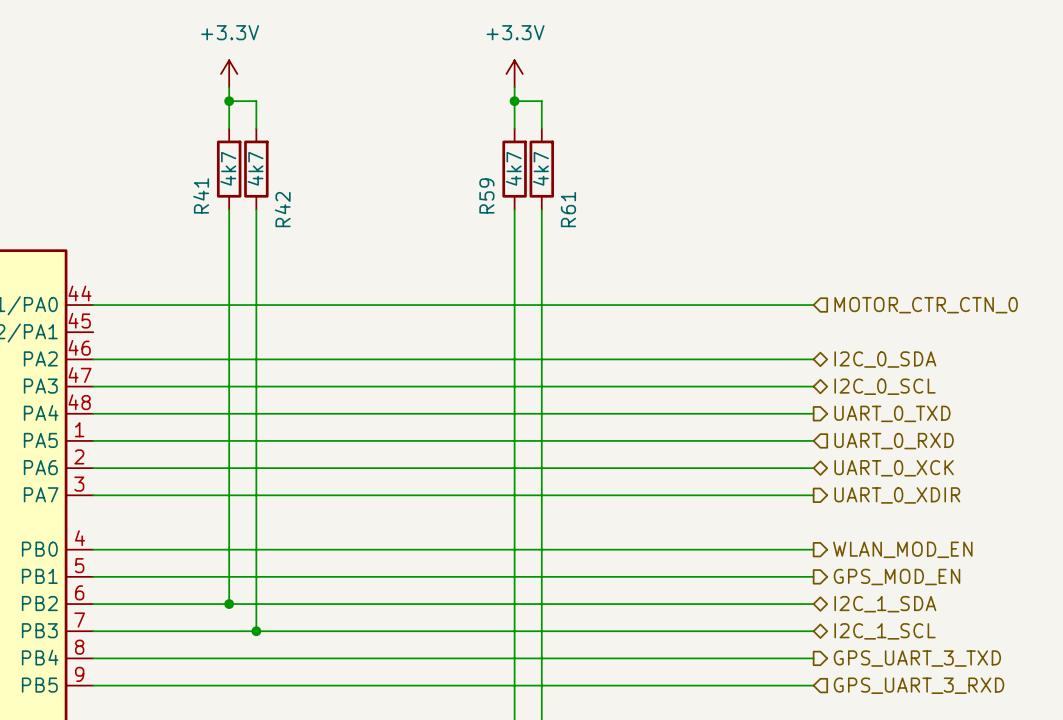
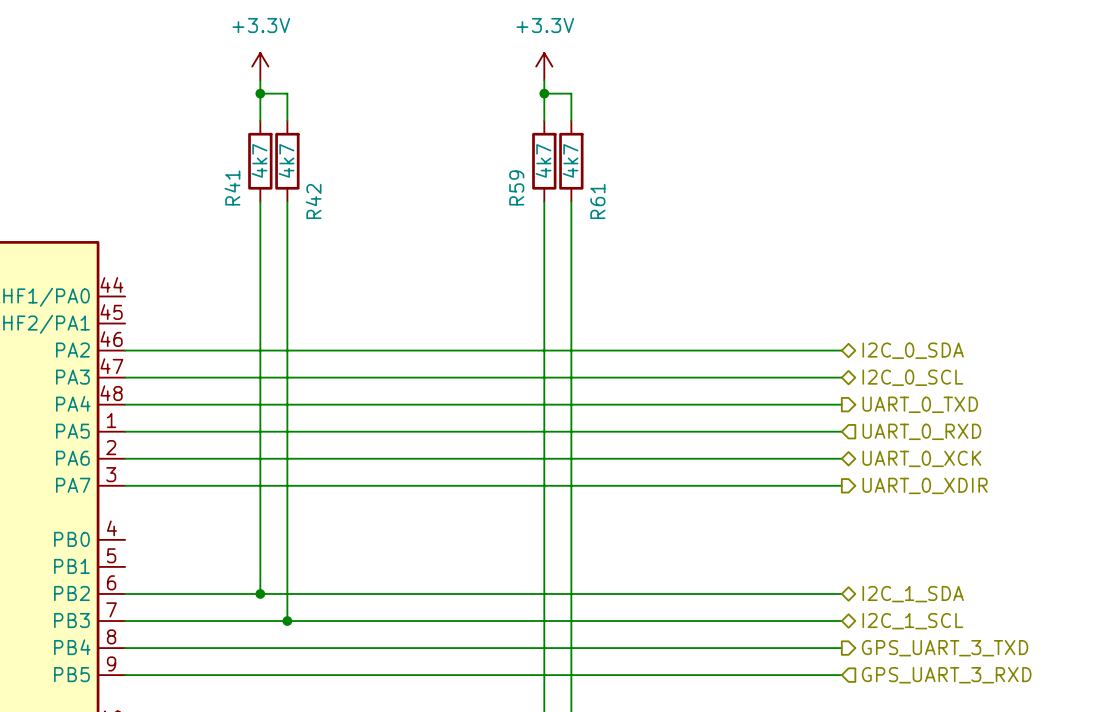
wire: (93, 305) (813, 305) -> none
hierarchical label: MOTOR_CTR_CTN_0 (926, 305) -> none
wire: (93, 549) (813, 549) -> none
hierarchical label: WLAN_MOD_EN (902, 549) -> none
wire: (93, 576) (813, 576) -> none
hierarchical label: GPS_MOD_EN (897, 577) -> none

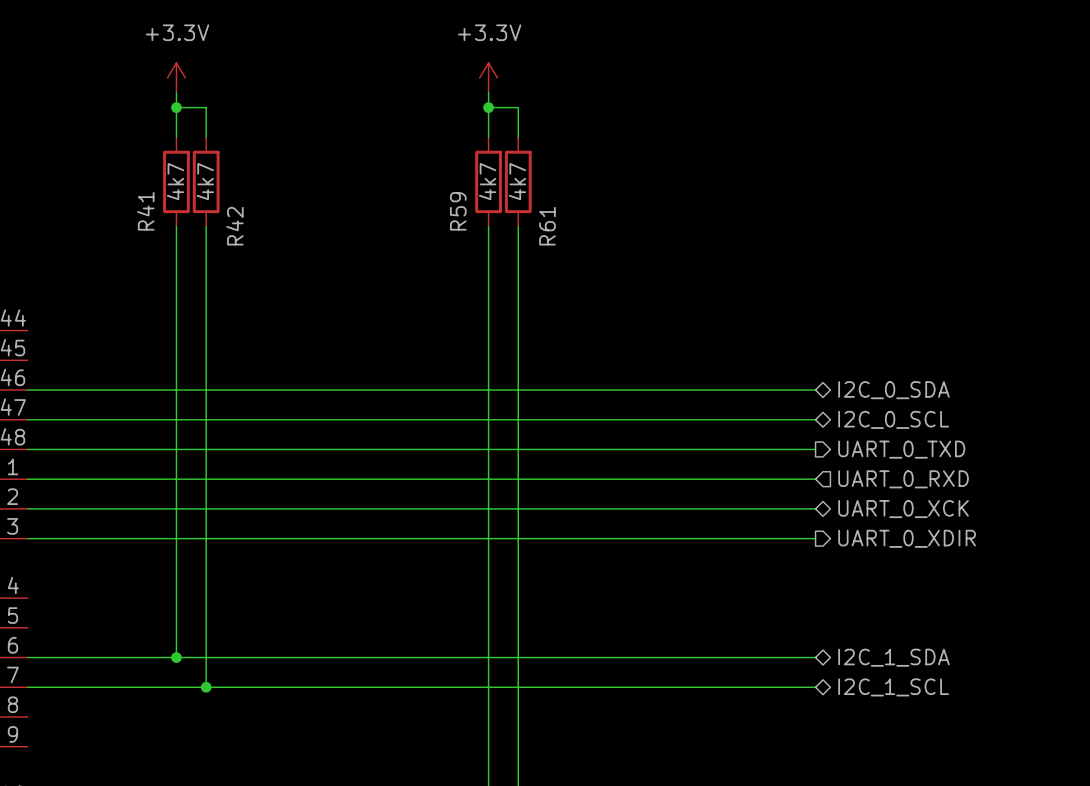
wire: (125, 648) (841, 648) -> none
hierarchical label: GPS_UART_3_TXD (945, 648) -> none
wire: (125, 675) (841, 675) -> none
hierarchical label: GPS_UART_3_RXD (946, 675) -> none

